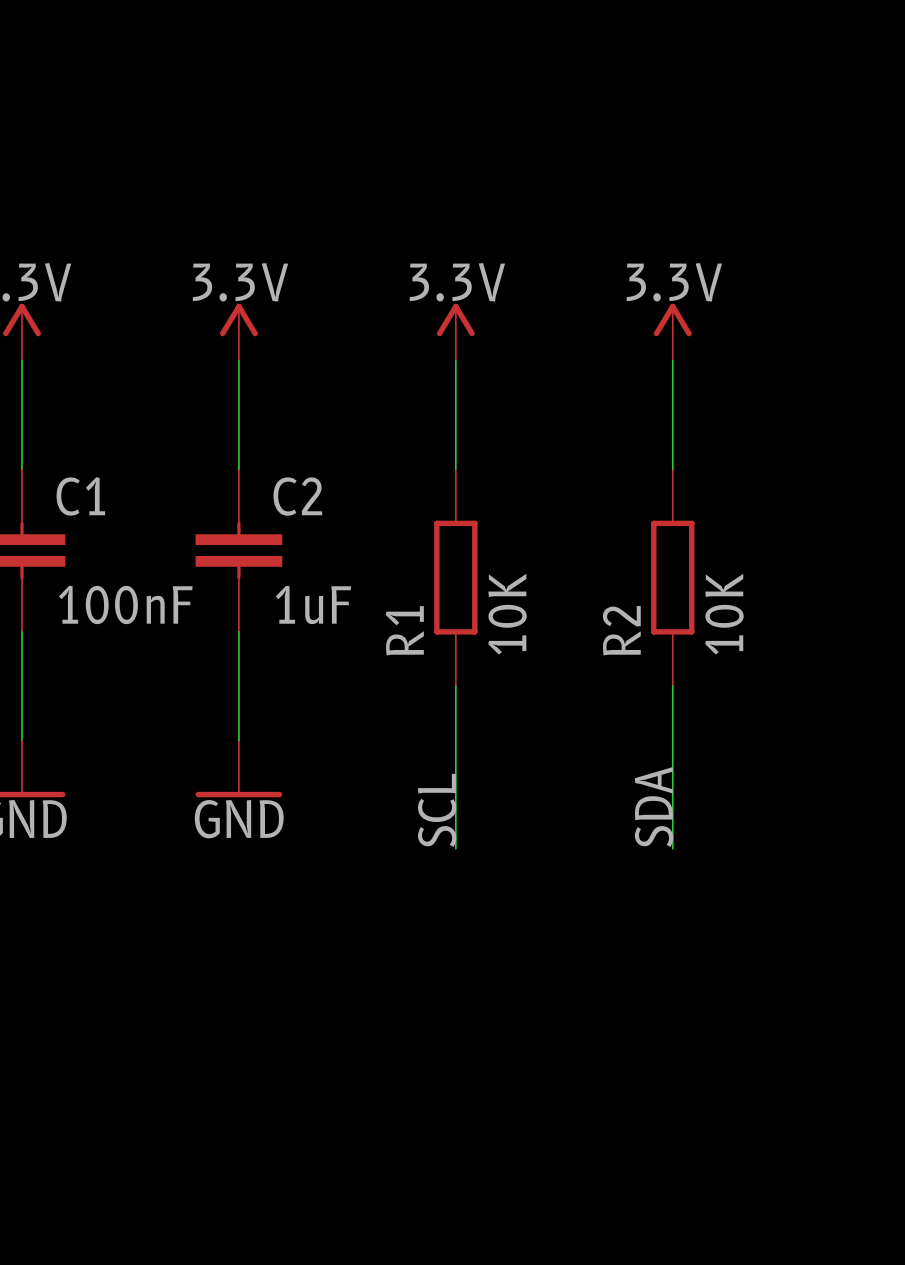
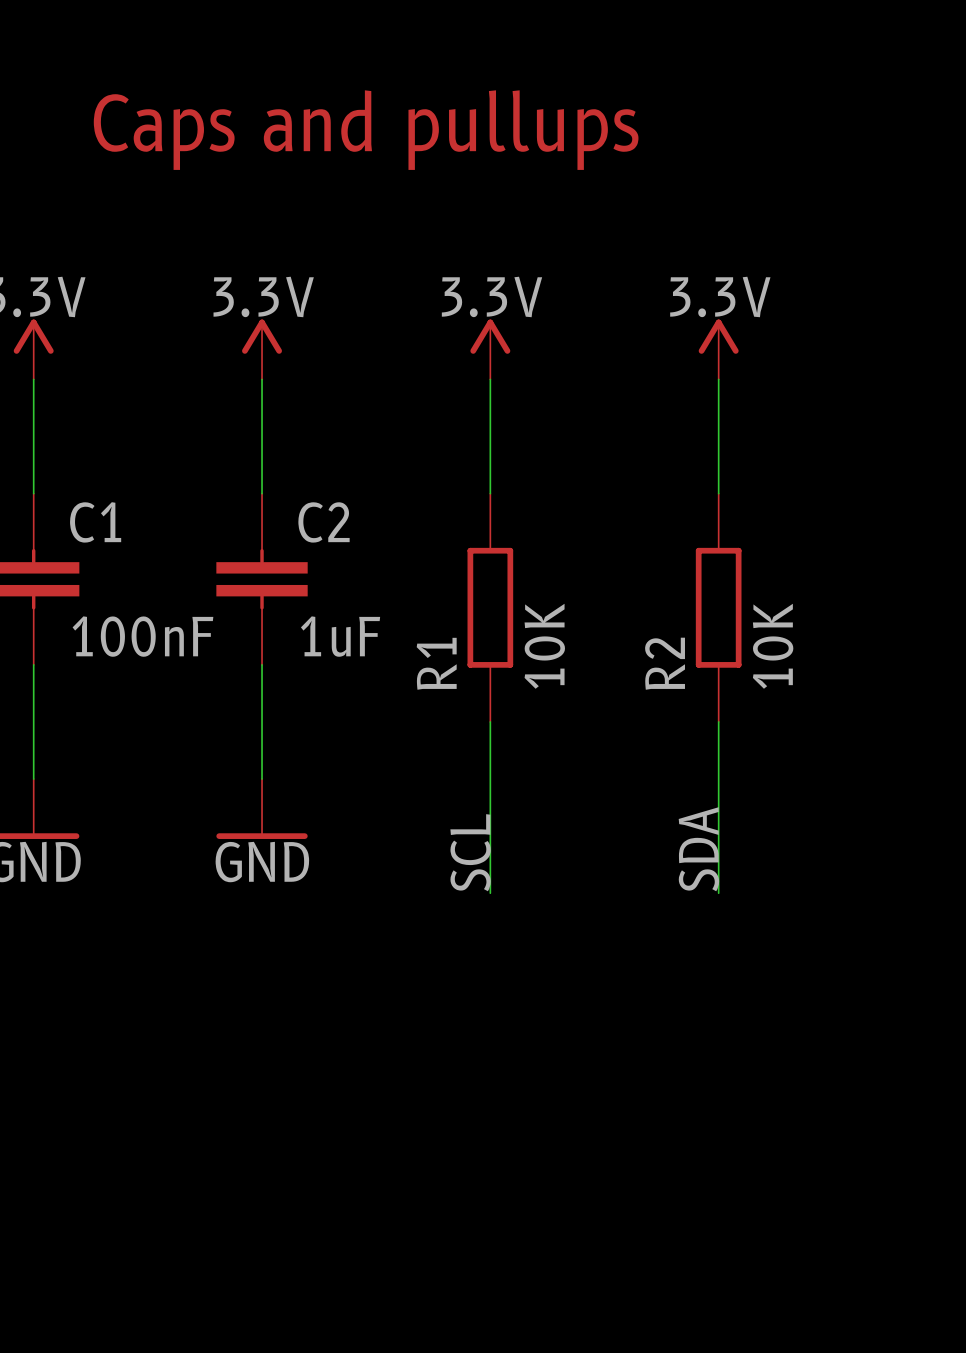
text: none -> Caps and pullups (366, 130)

